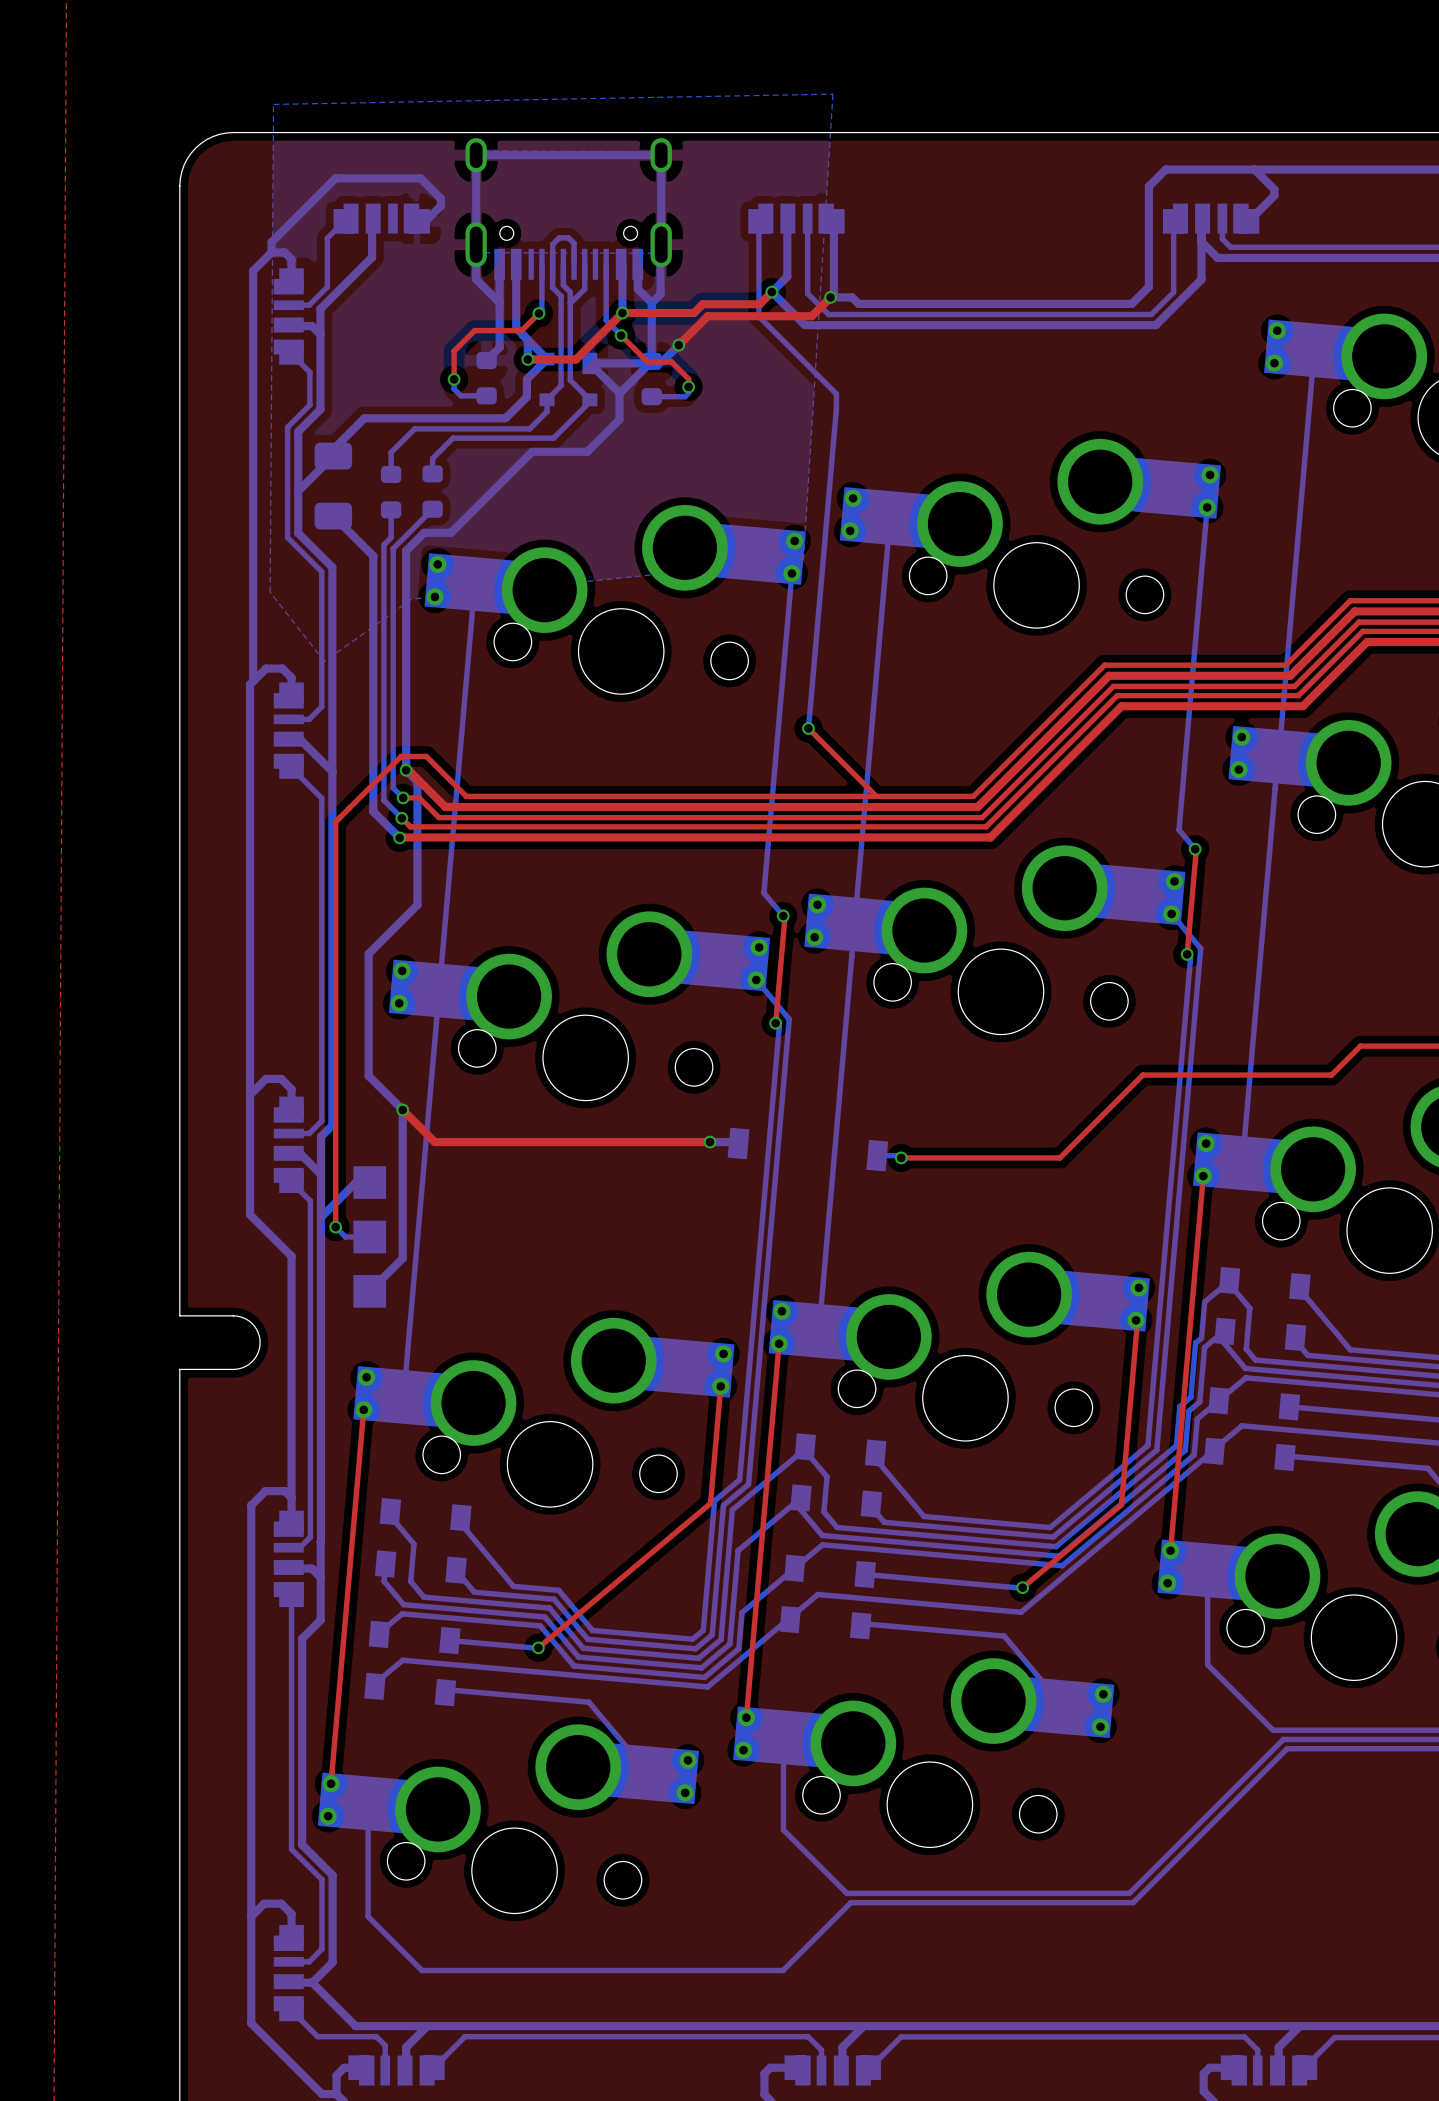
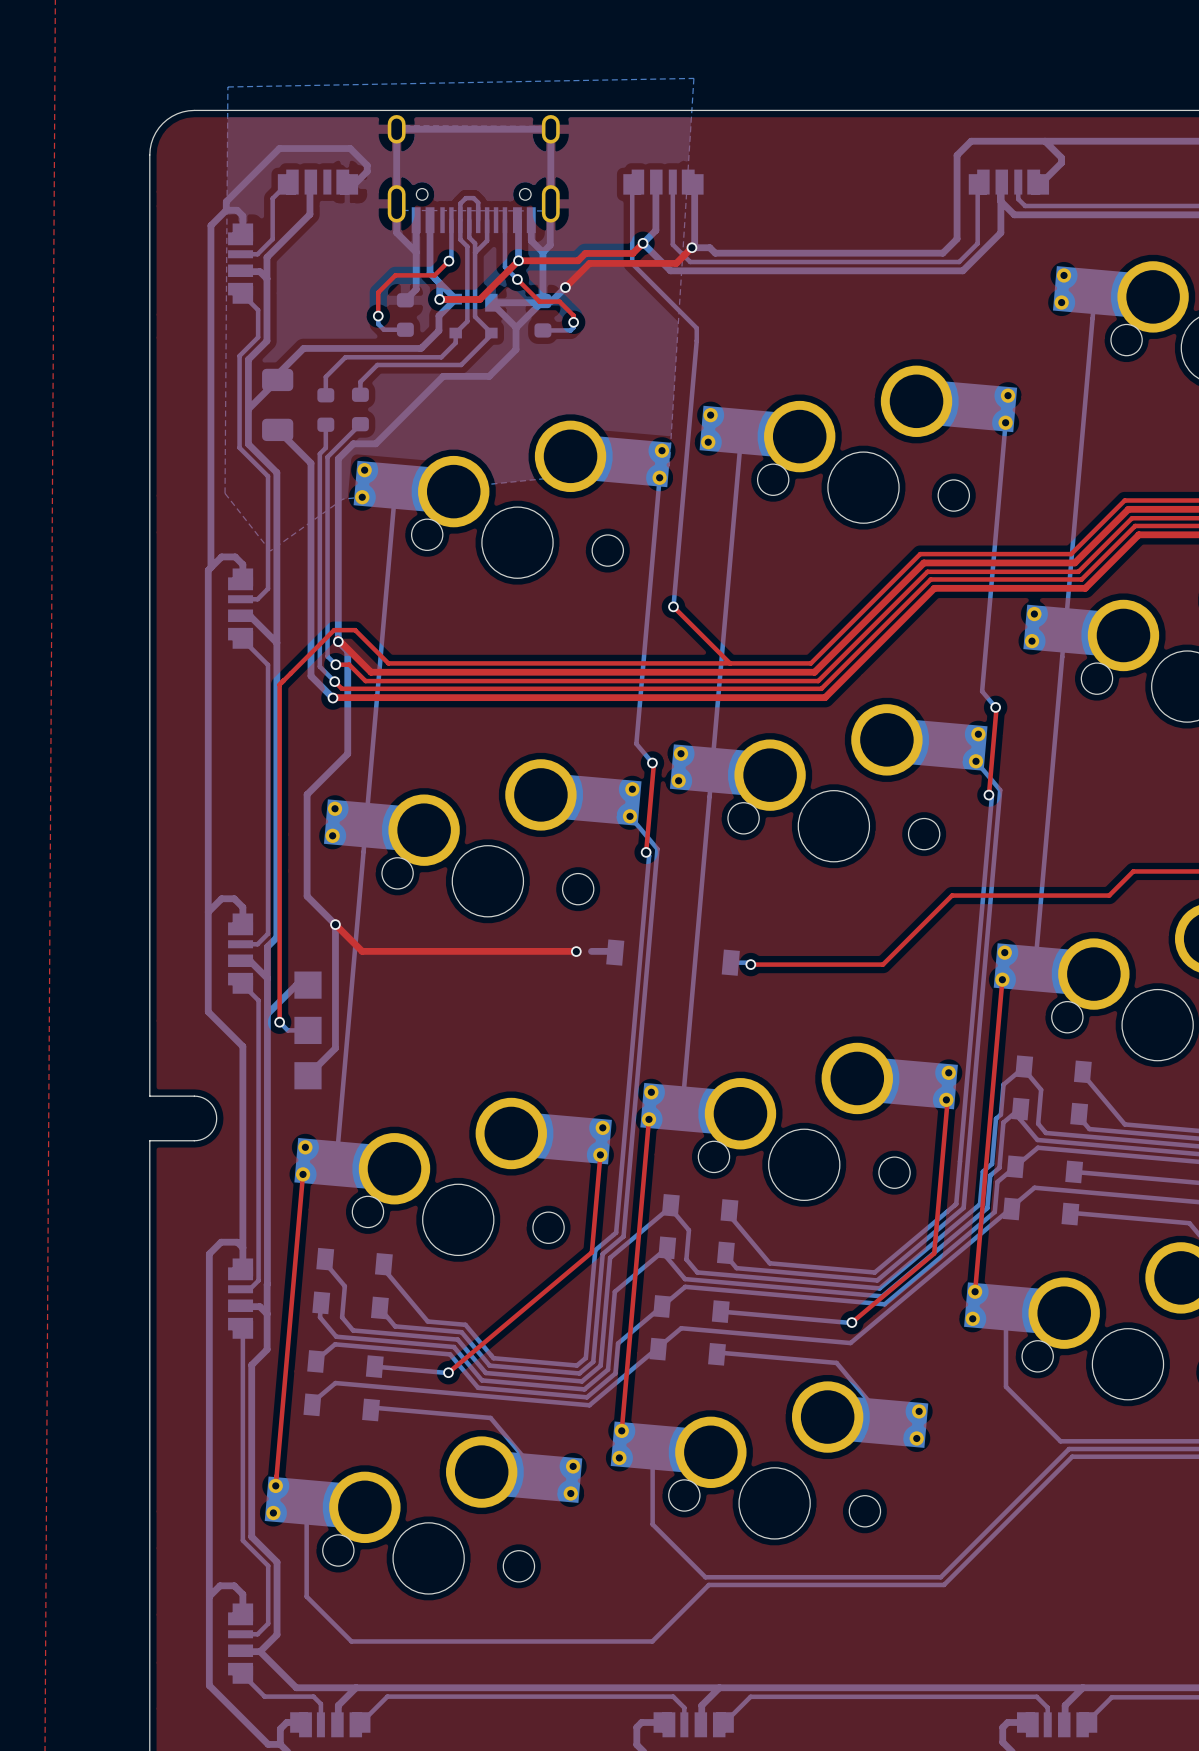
top track: (691, 1142) (710, 1142) -> none
via position: (710, 1142) -> (576, 951)

